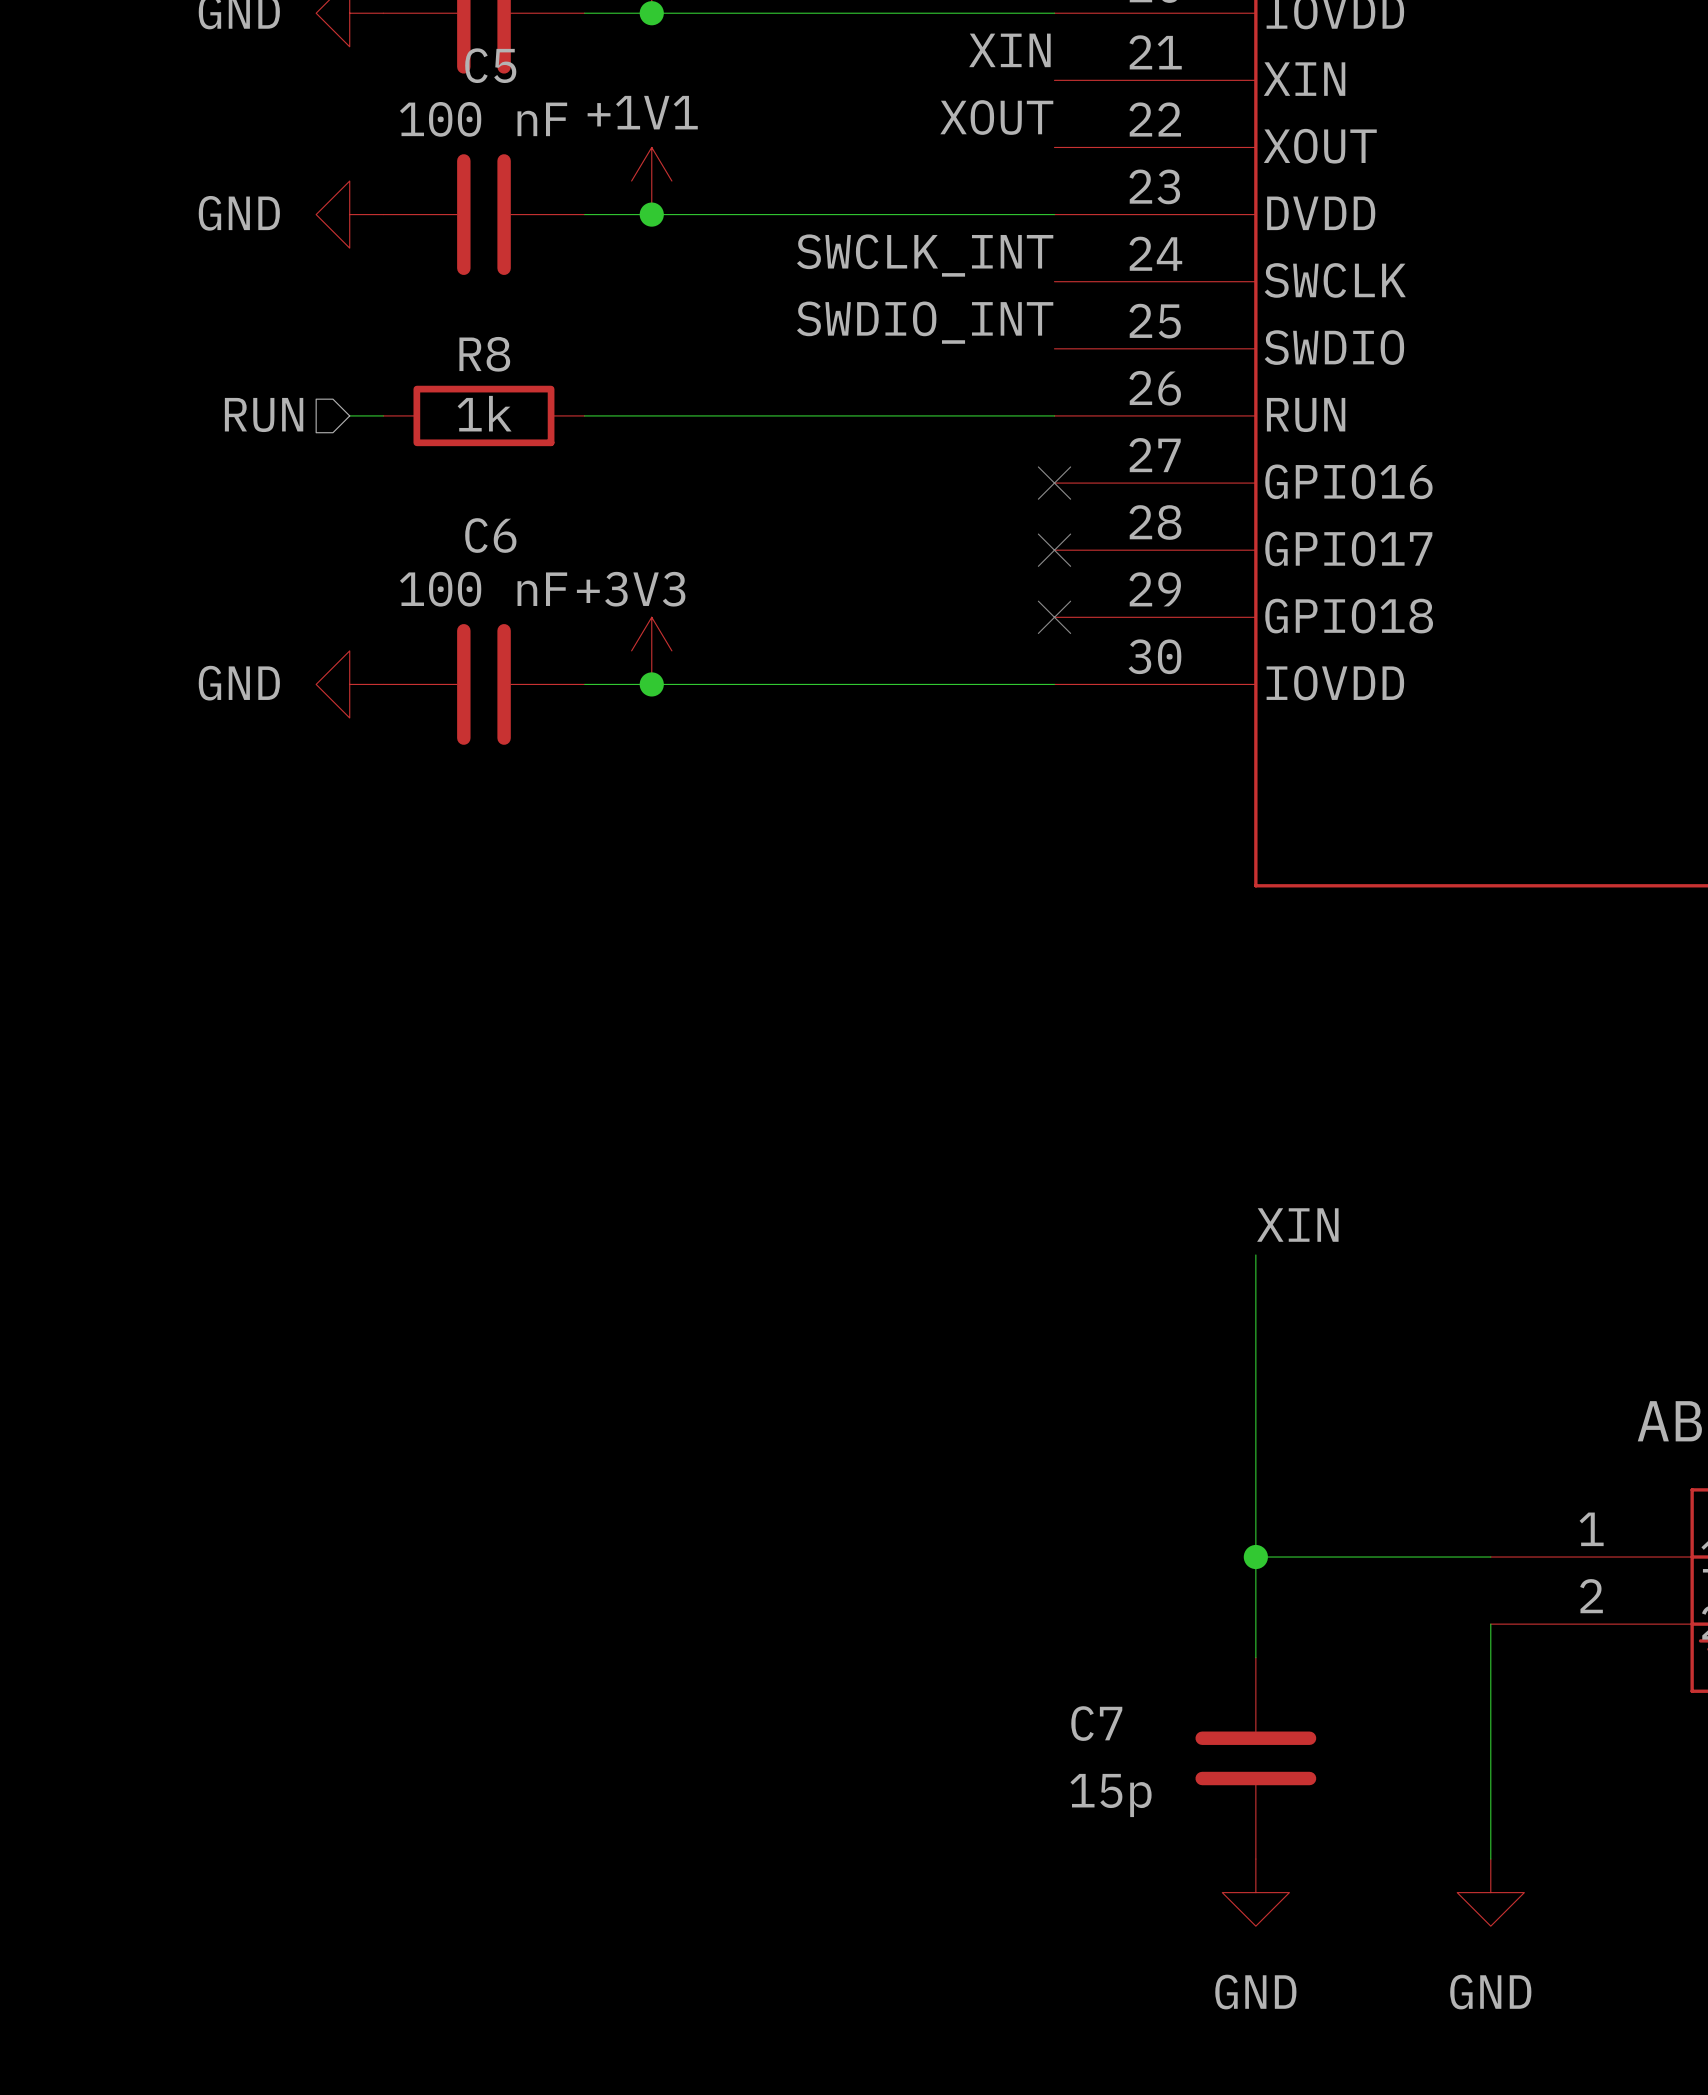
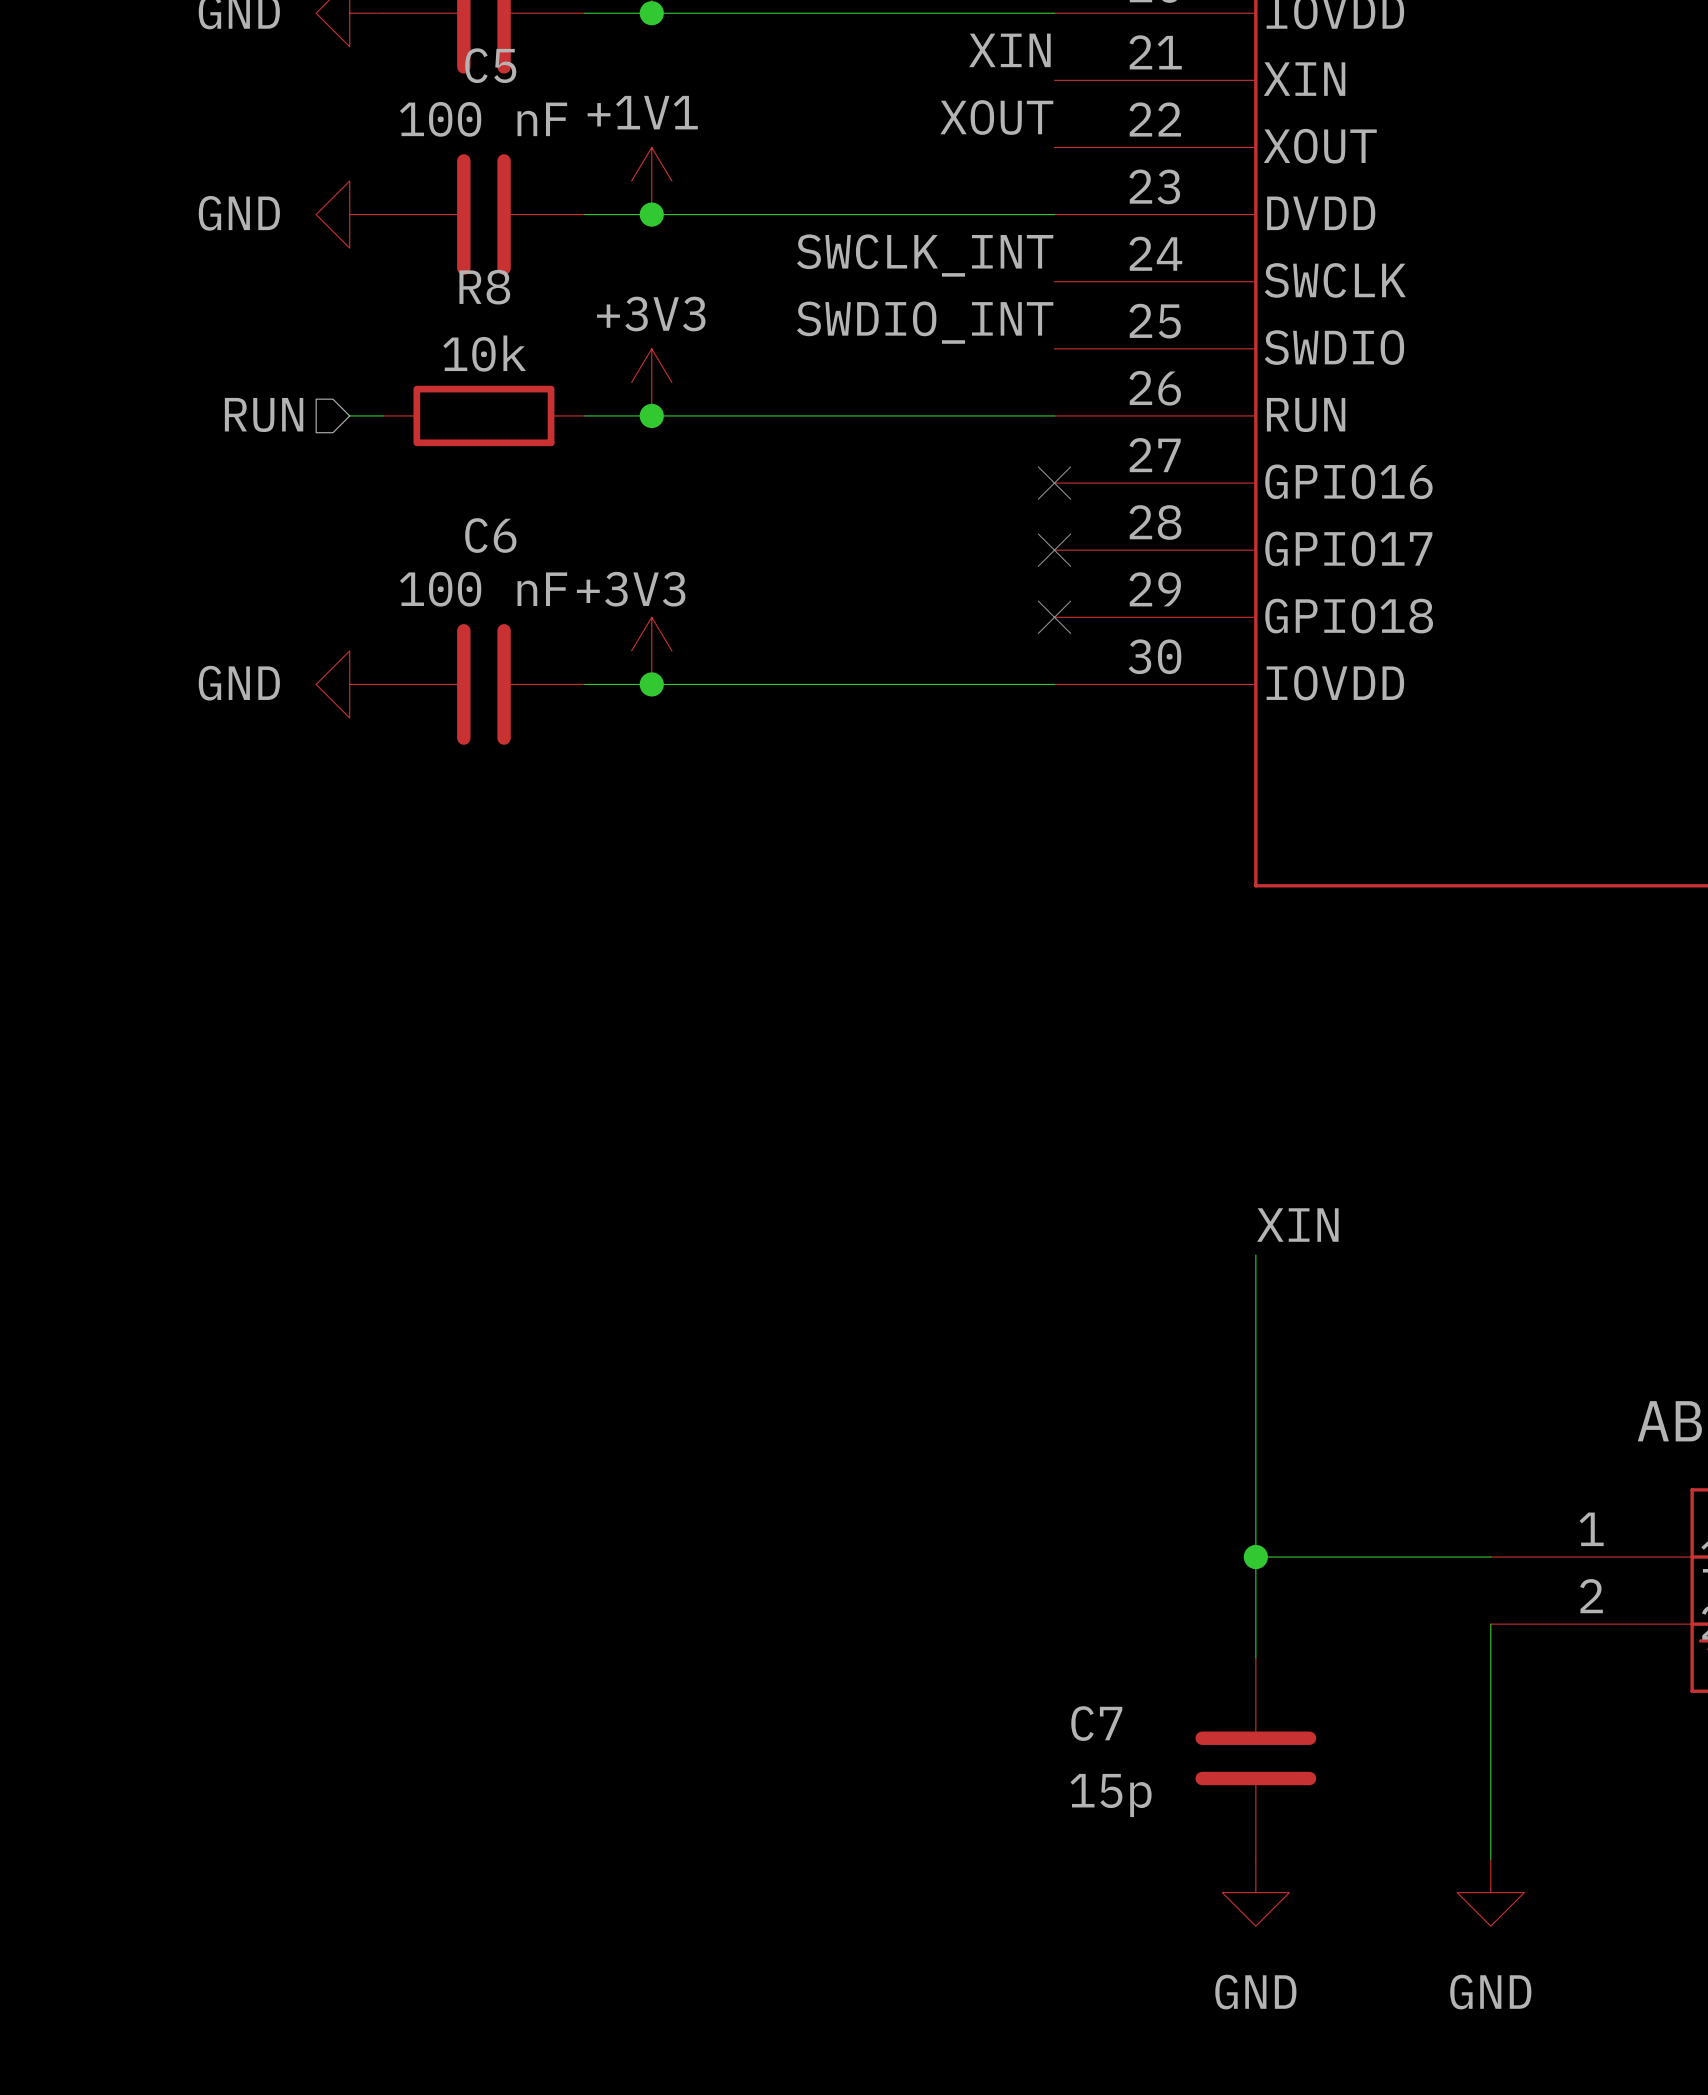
R8 name position: R8 (484, 354) -> R8 (484, 287)
power symbol: none -> +3V3 (651, 382)
R8 value: 1k (484, 413) -> 10k (484, 353)
junction: none -> (651, 415)

